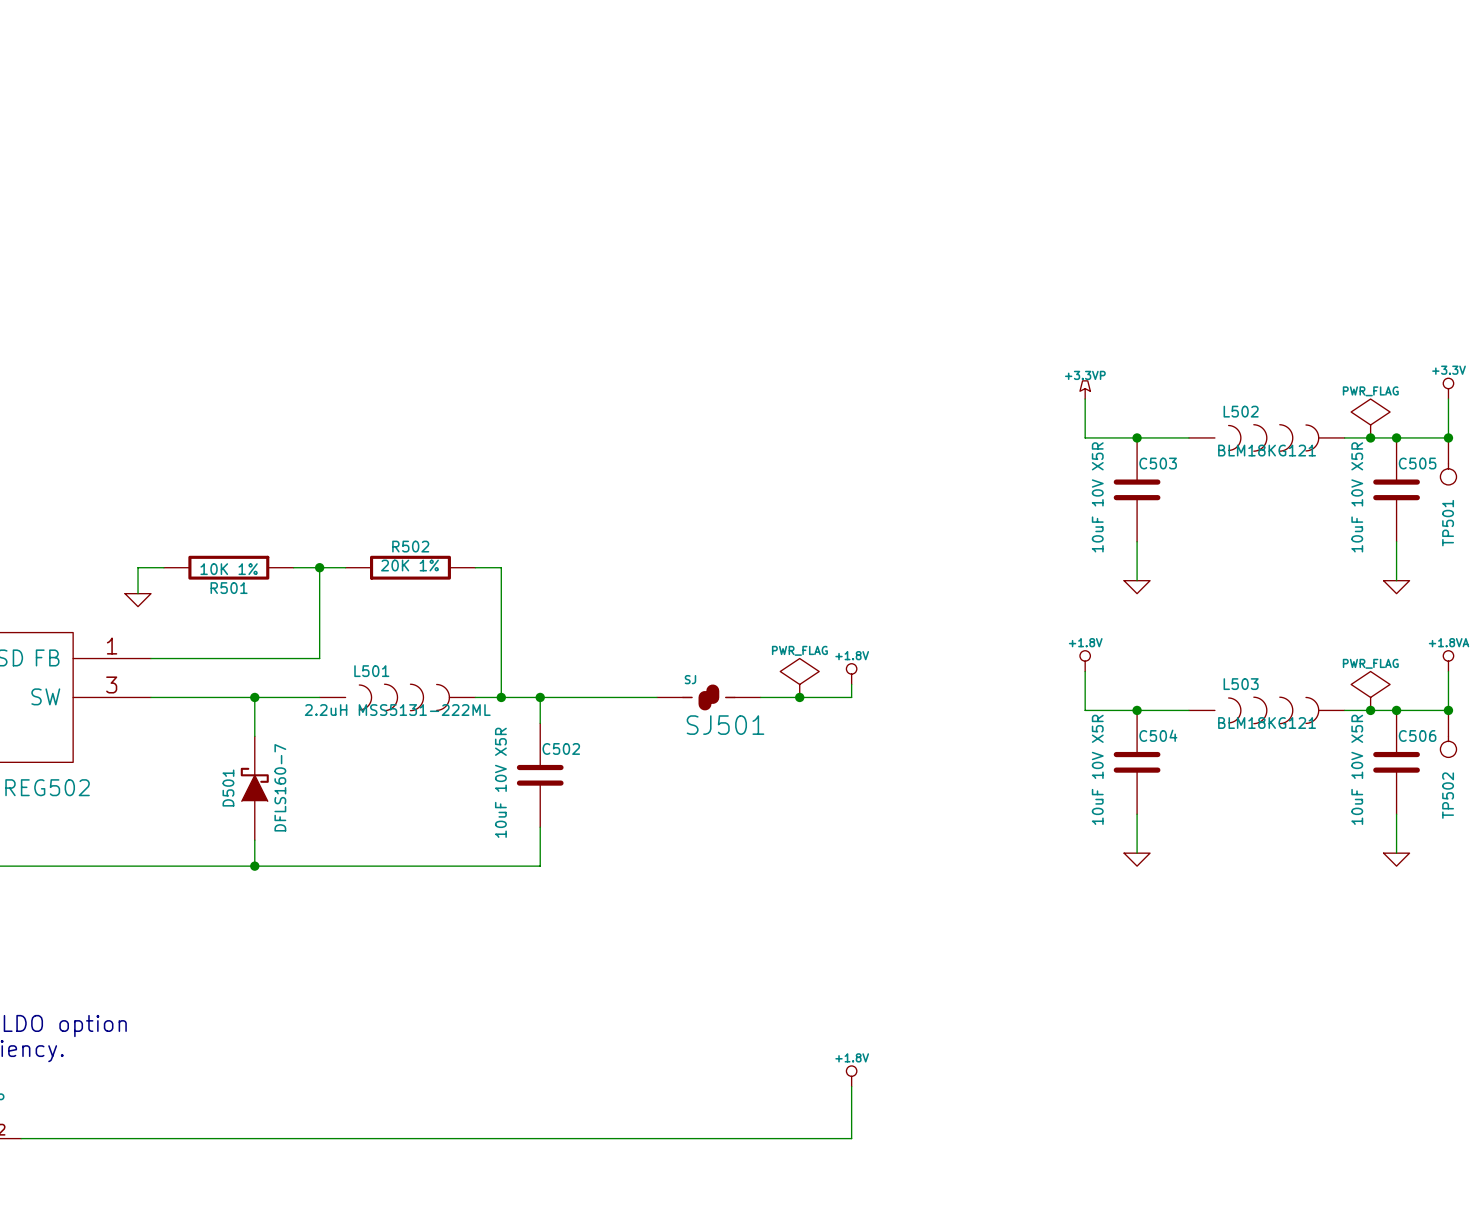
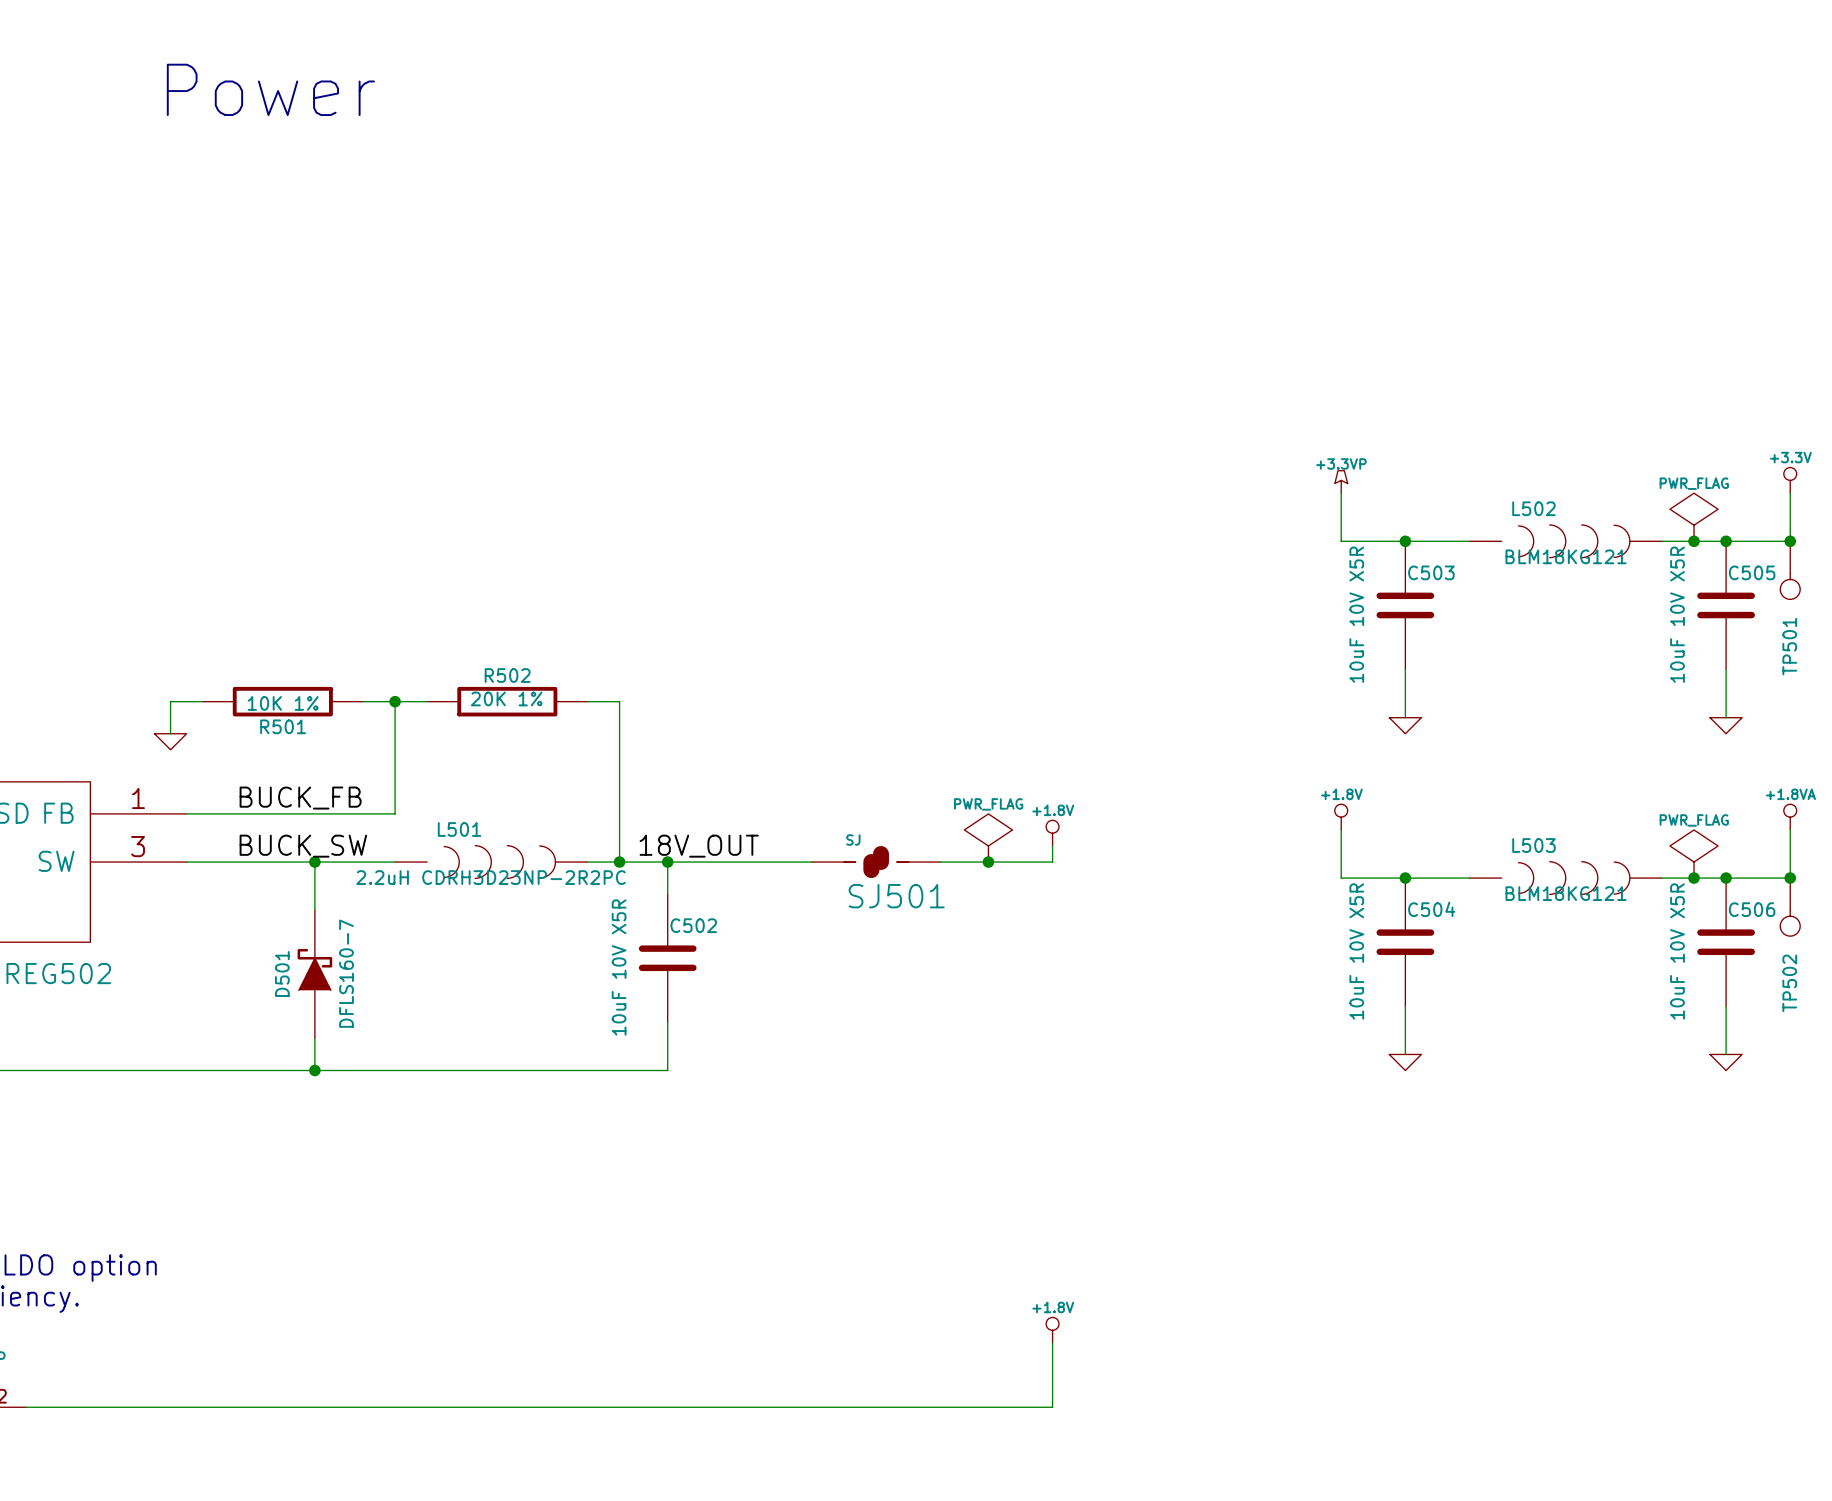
text: none -> Power (270, 89)
label: none -> BUCK_FB (300, 798)
label: none -> BUCK_SW (303, 846)
label: none -> 18V_OUT (699, 846)
L501 value: 2.2uH MSS5131-222ML (397, 710) -> 2.2uH CDRH3D23NP-2R2PC (490, 877)

